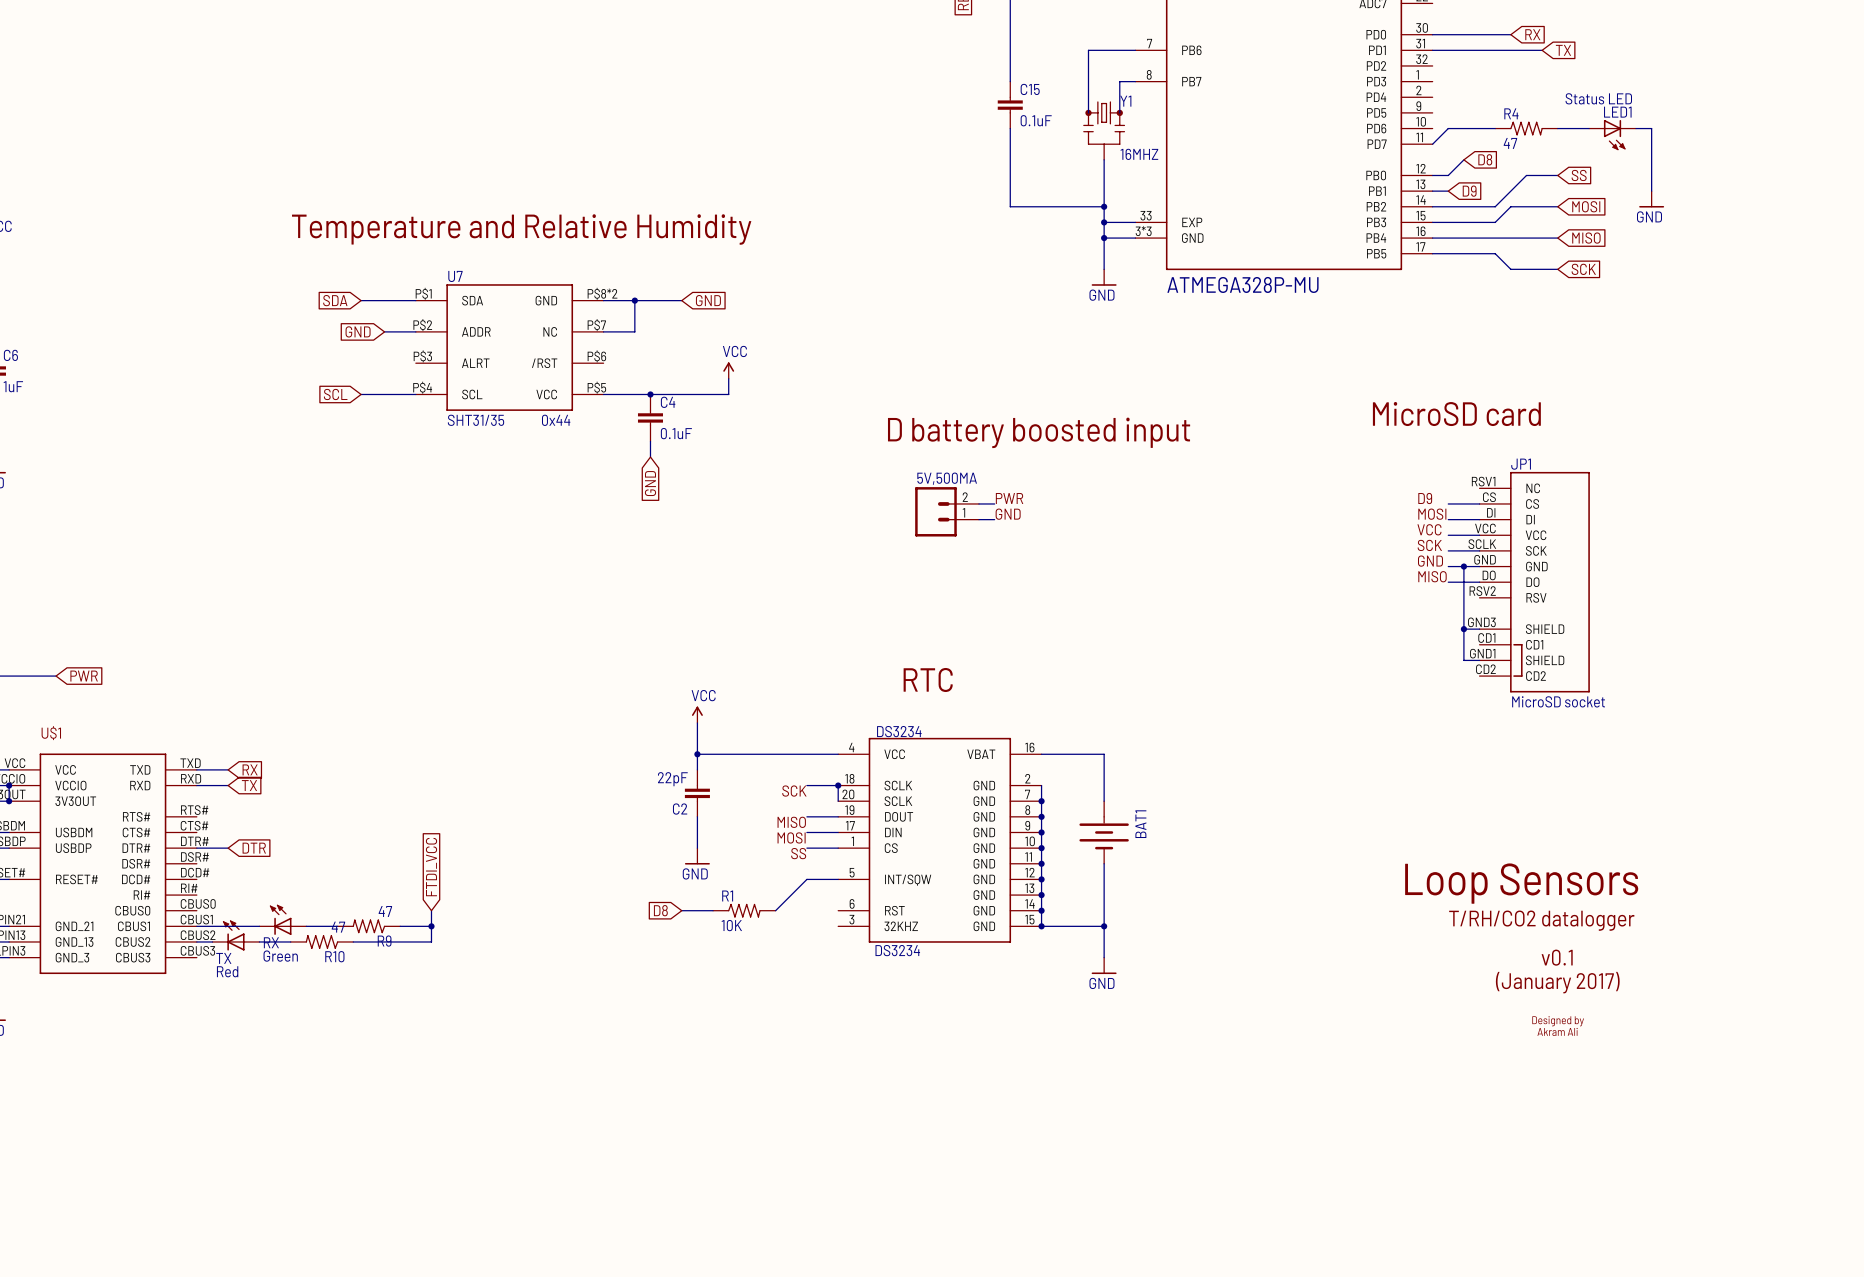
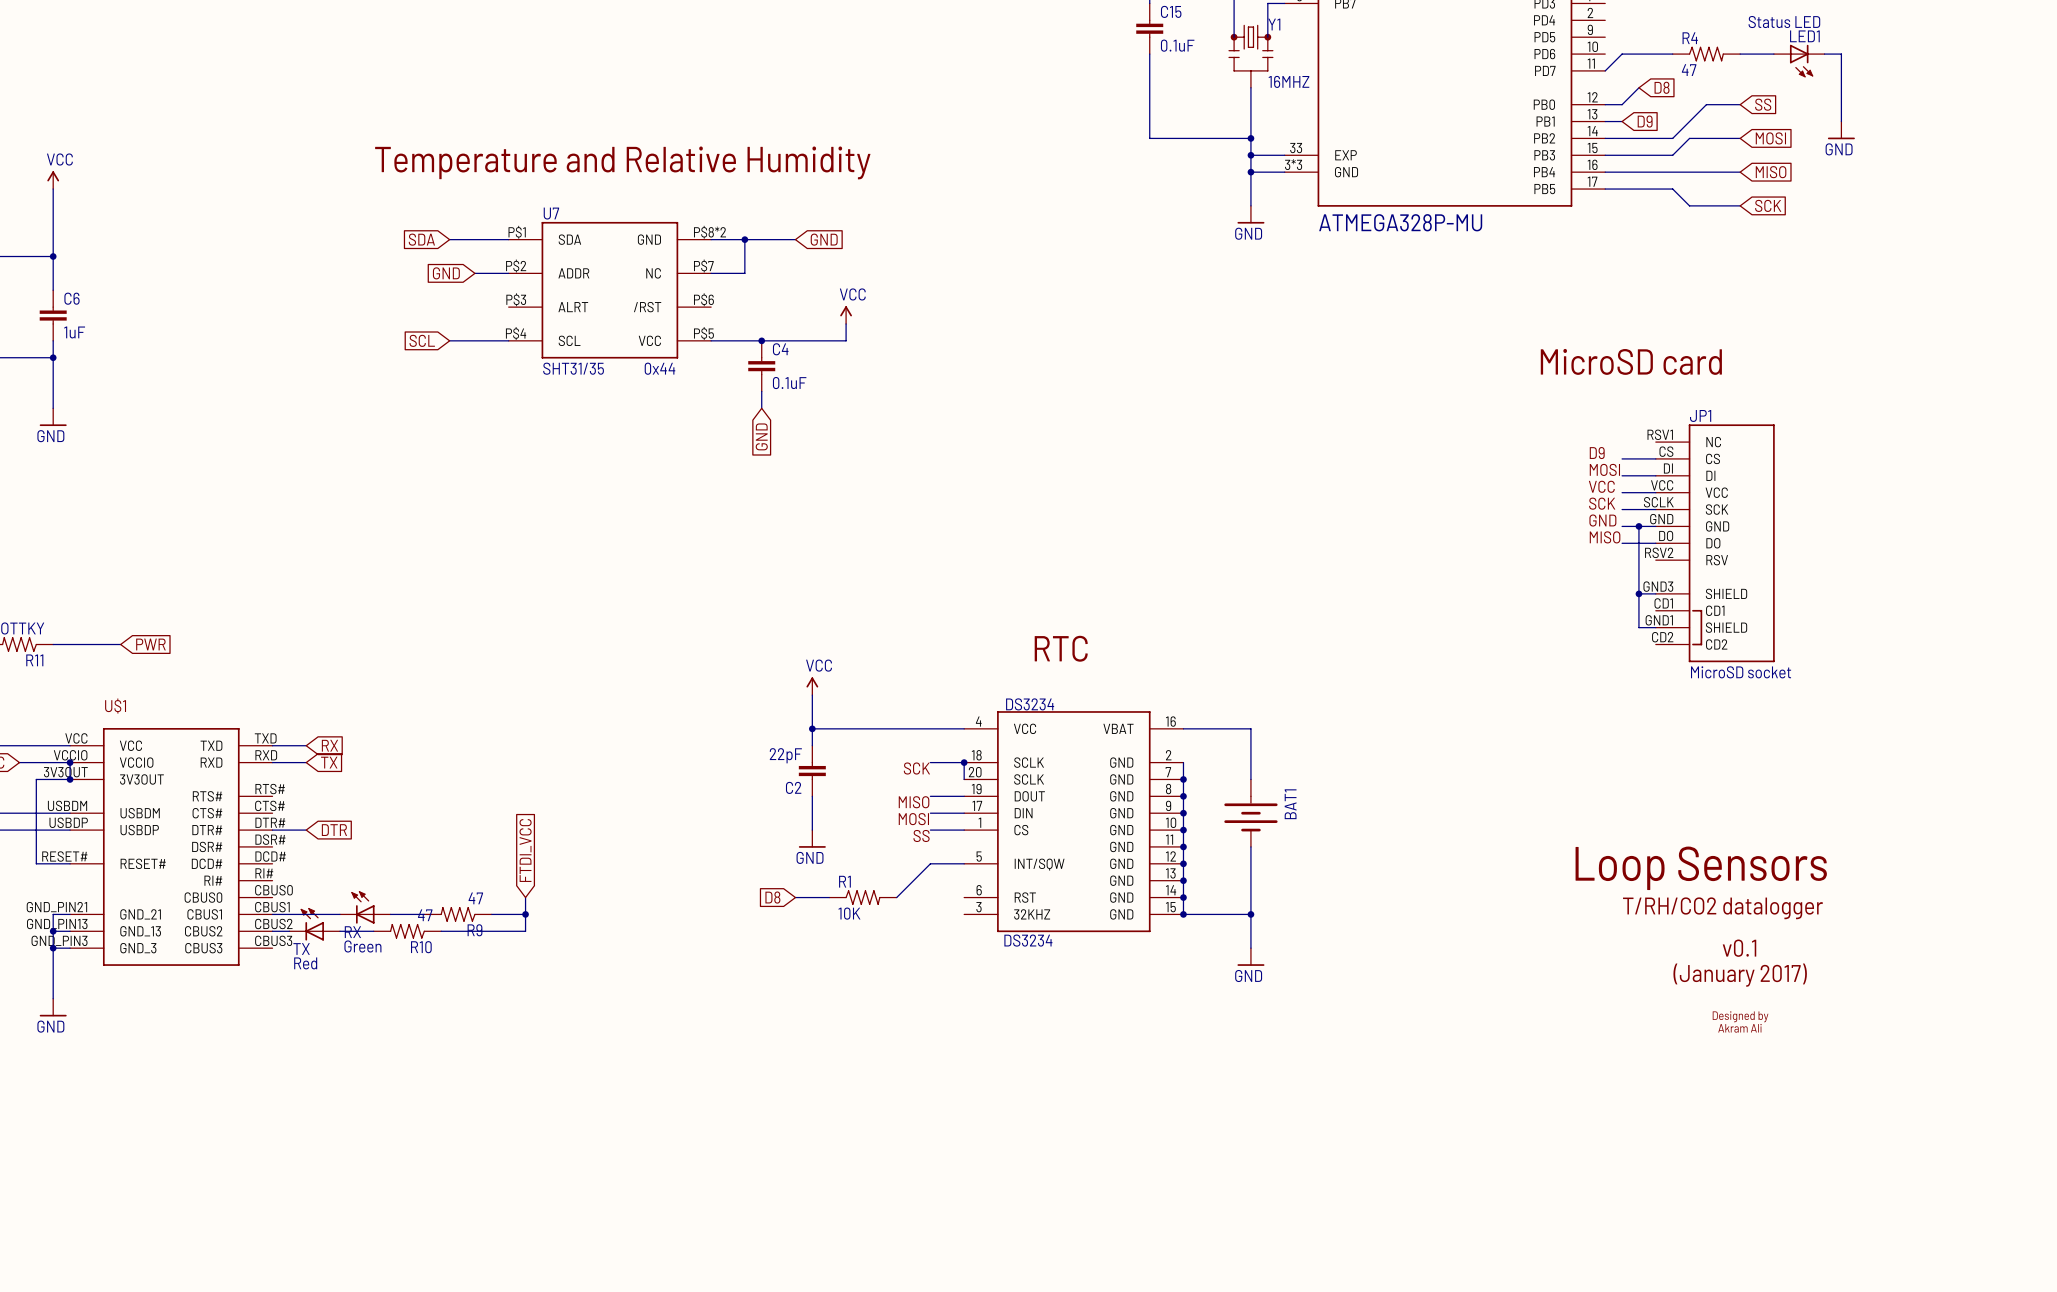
text: D battery boosted input (1039, 432) -> none
label: PWR (1009, 498) -> none
wire: (978, 503) (994, 503) -> none
5V,500MA: (947, 511) -> none
label: GND (1008, 514) -> none
wire: (978, 519) (994, 519) -> none

